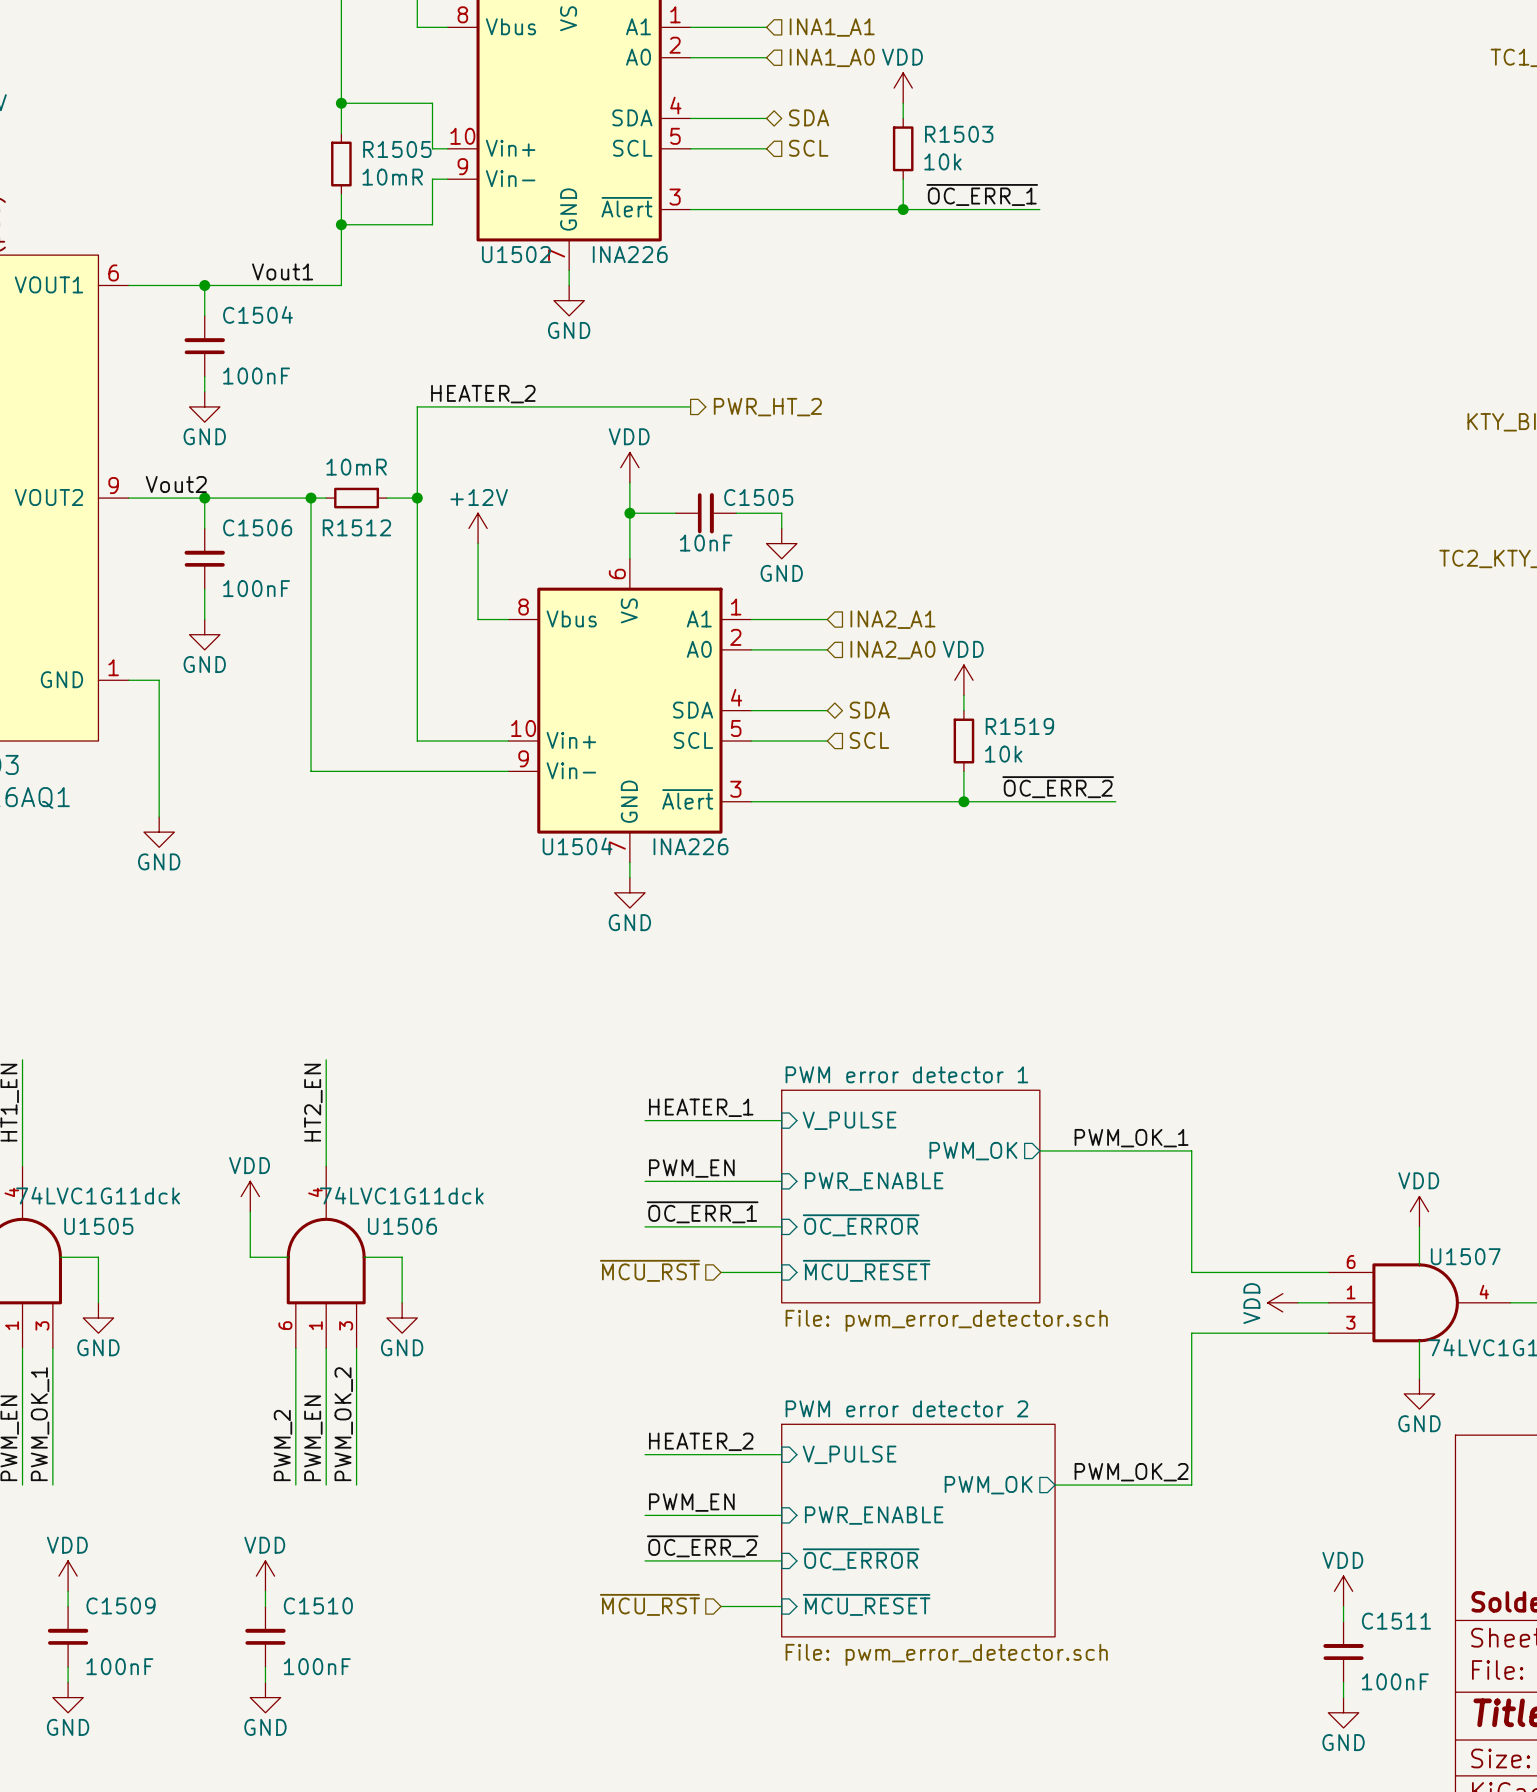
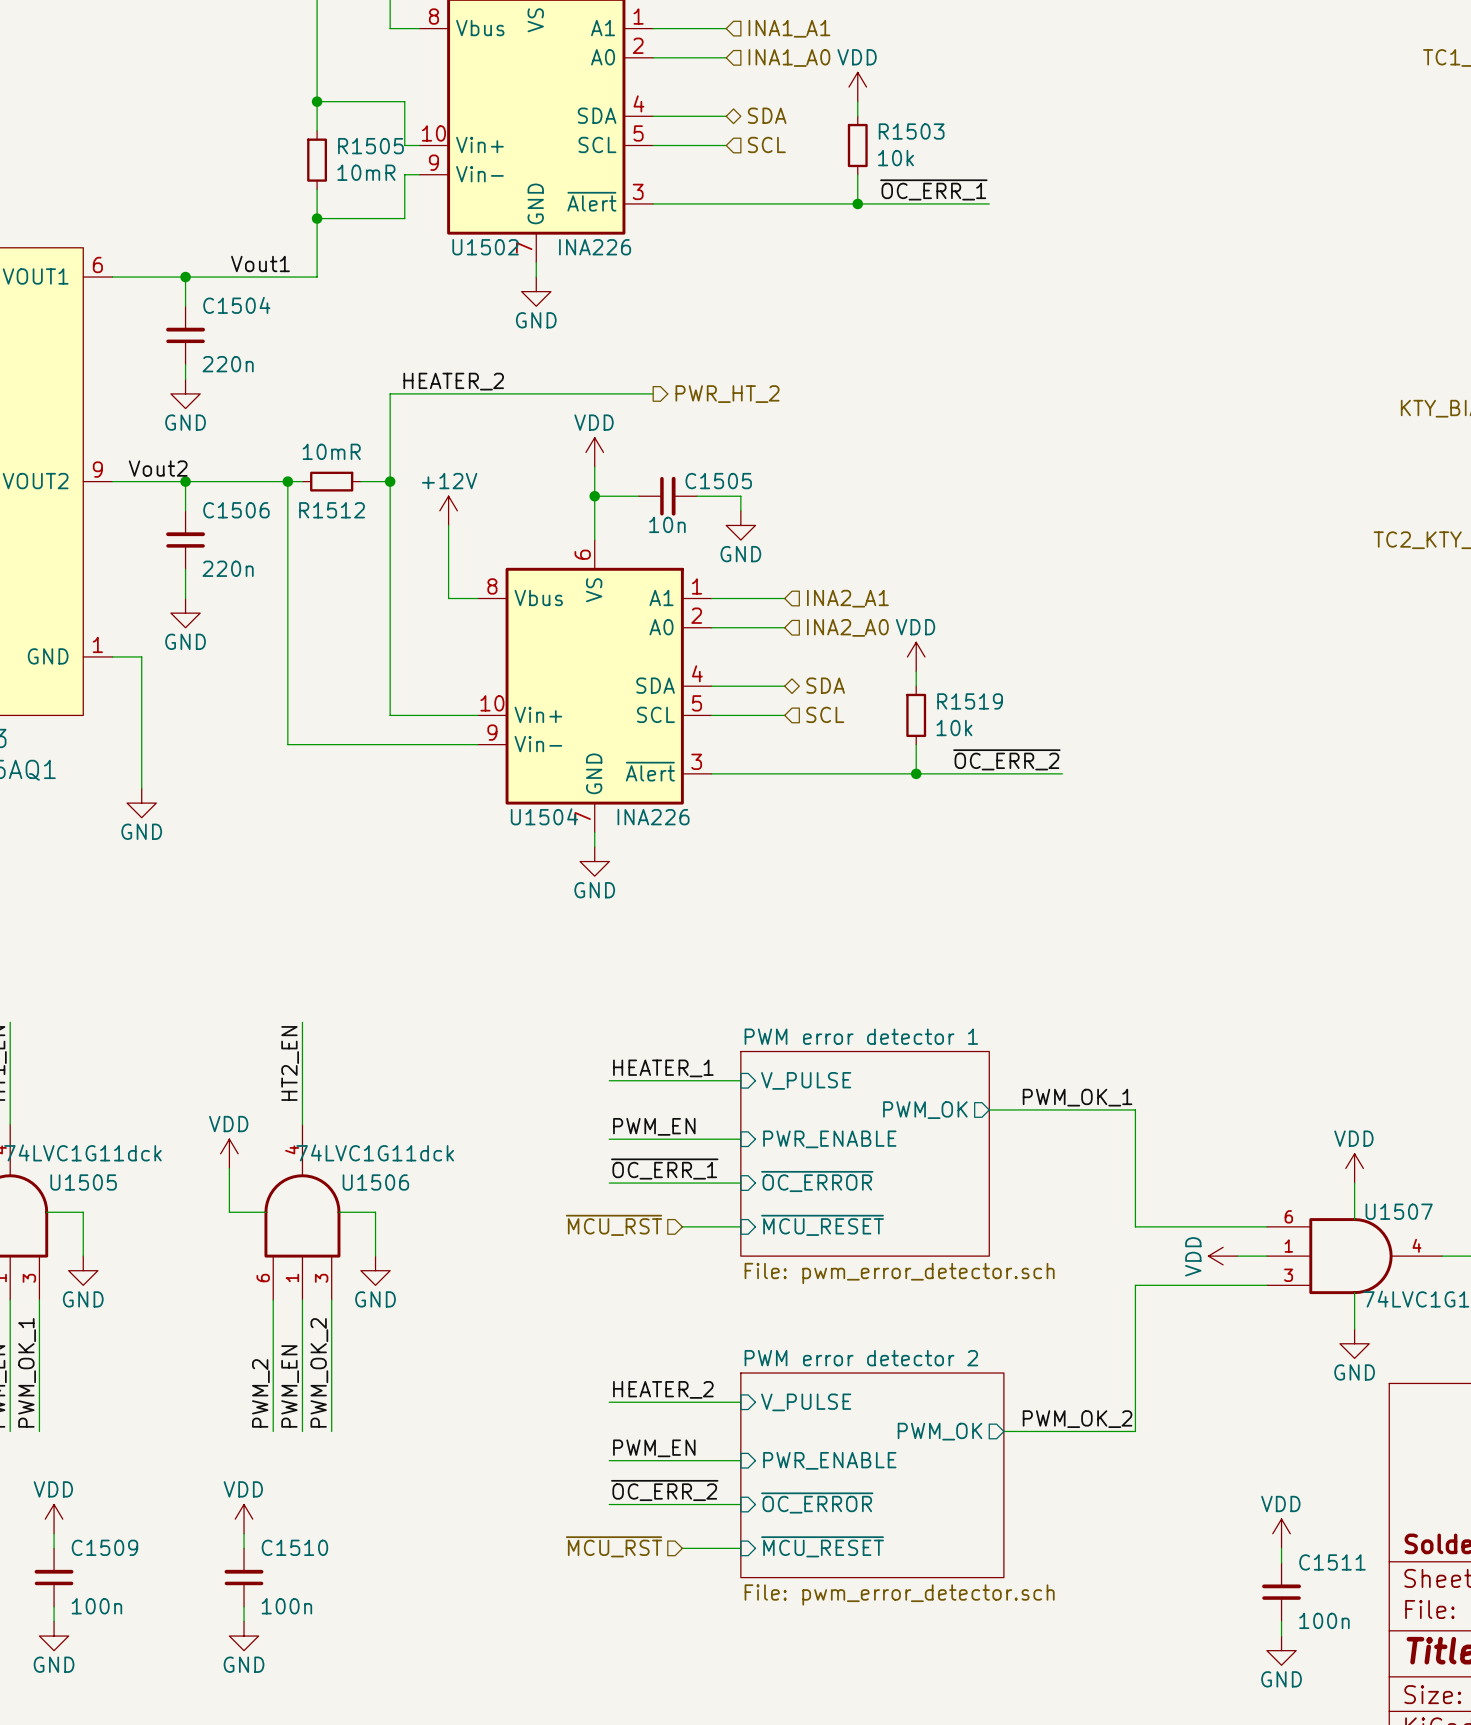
C1504 value: 100nF (256, 376) -> 220n (228, 364)
C1505 value: 10nF (706, 543) -> 10n (667, 524)
C1506 value: 100nF (256, 588) -> 220n (228, 568)
C1509 value: 100nF (119, 1666) -> 100n (96, 1606)
C1510 value: 100nF (317, 1666) -> 100n (286, 1606)
C1511 value: 100nF (1395, 1681) -> 100n (1324, 1620)

